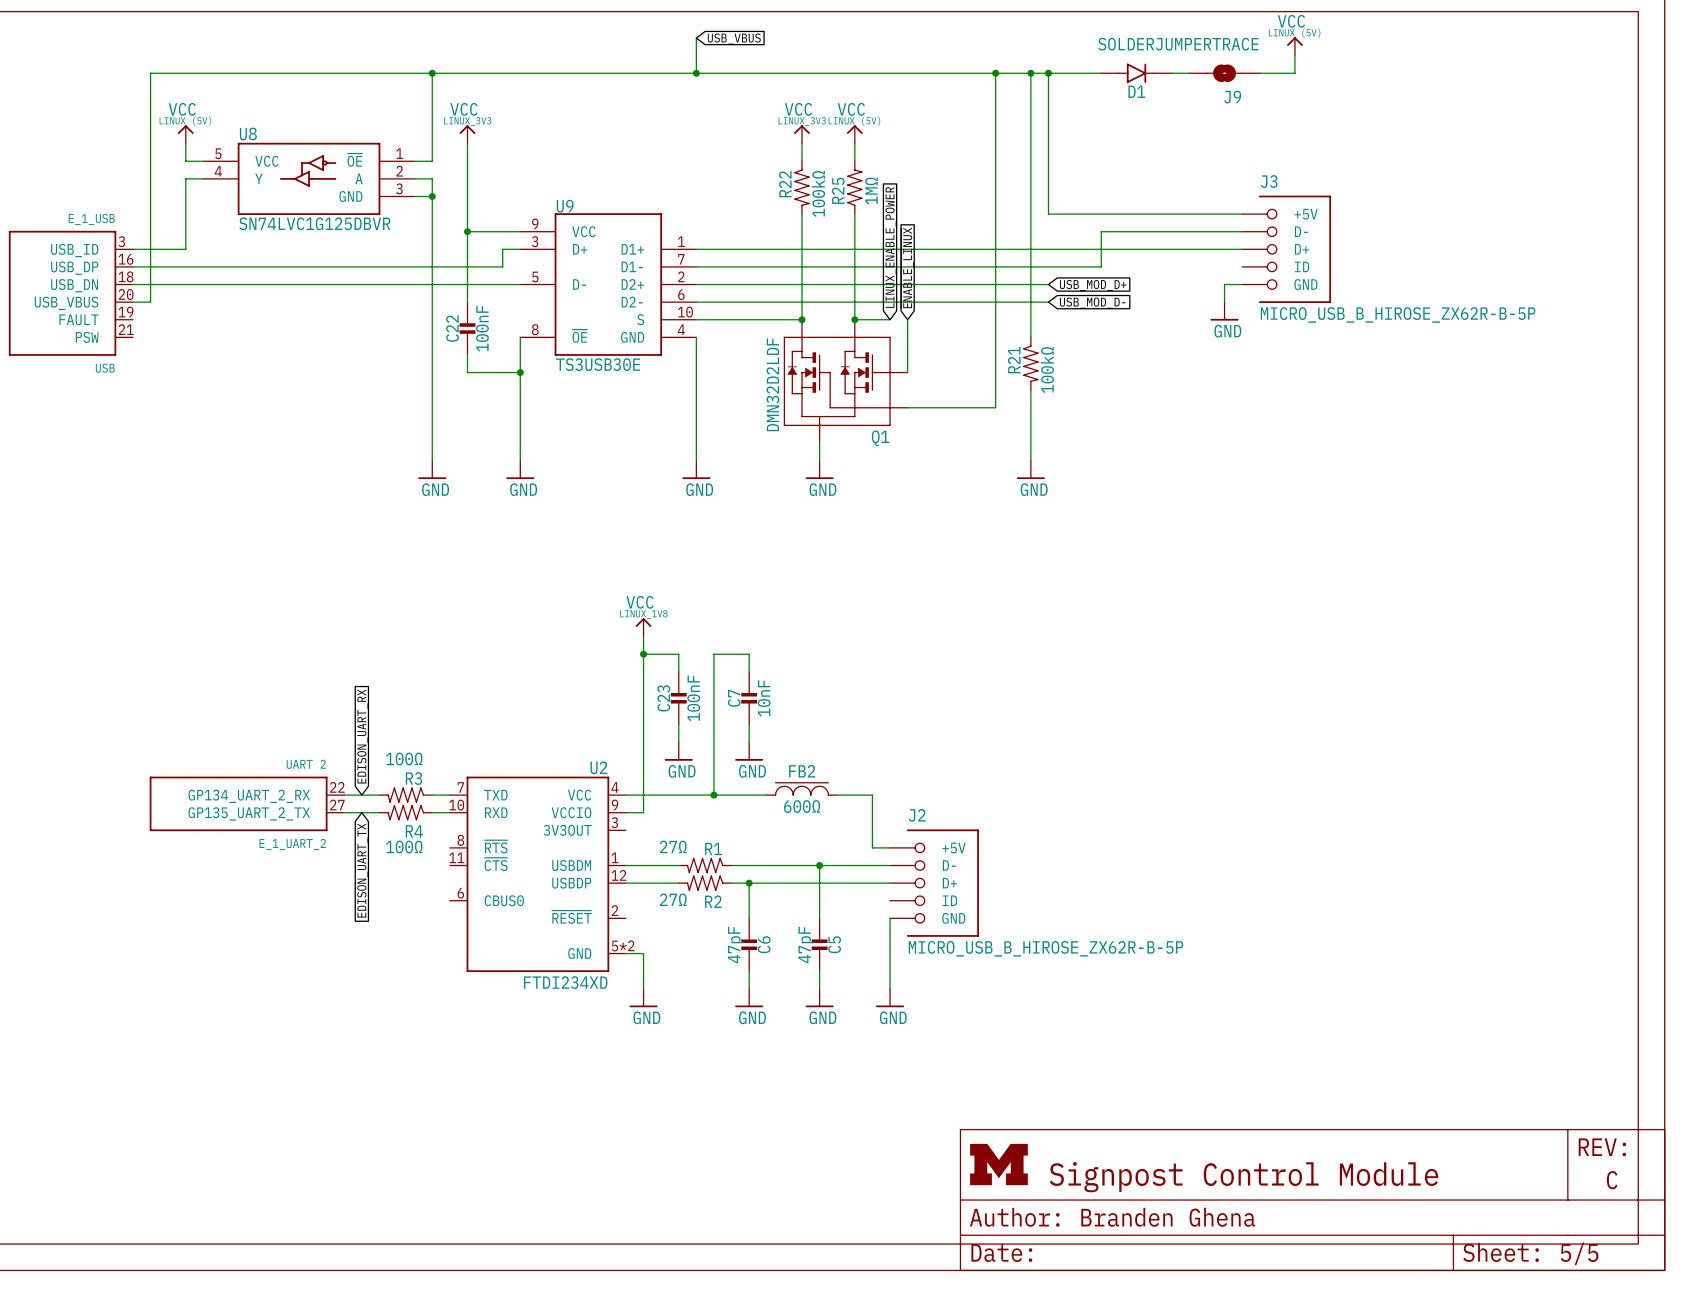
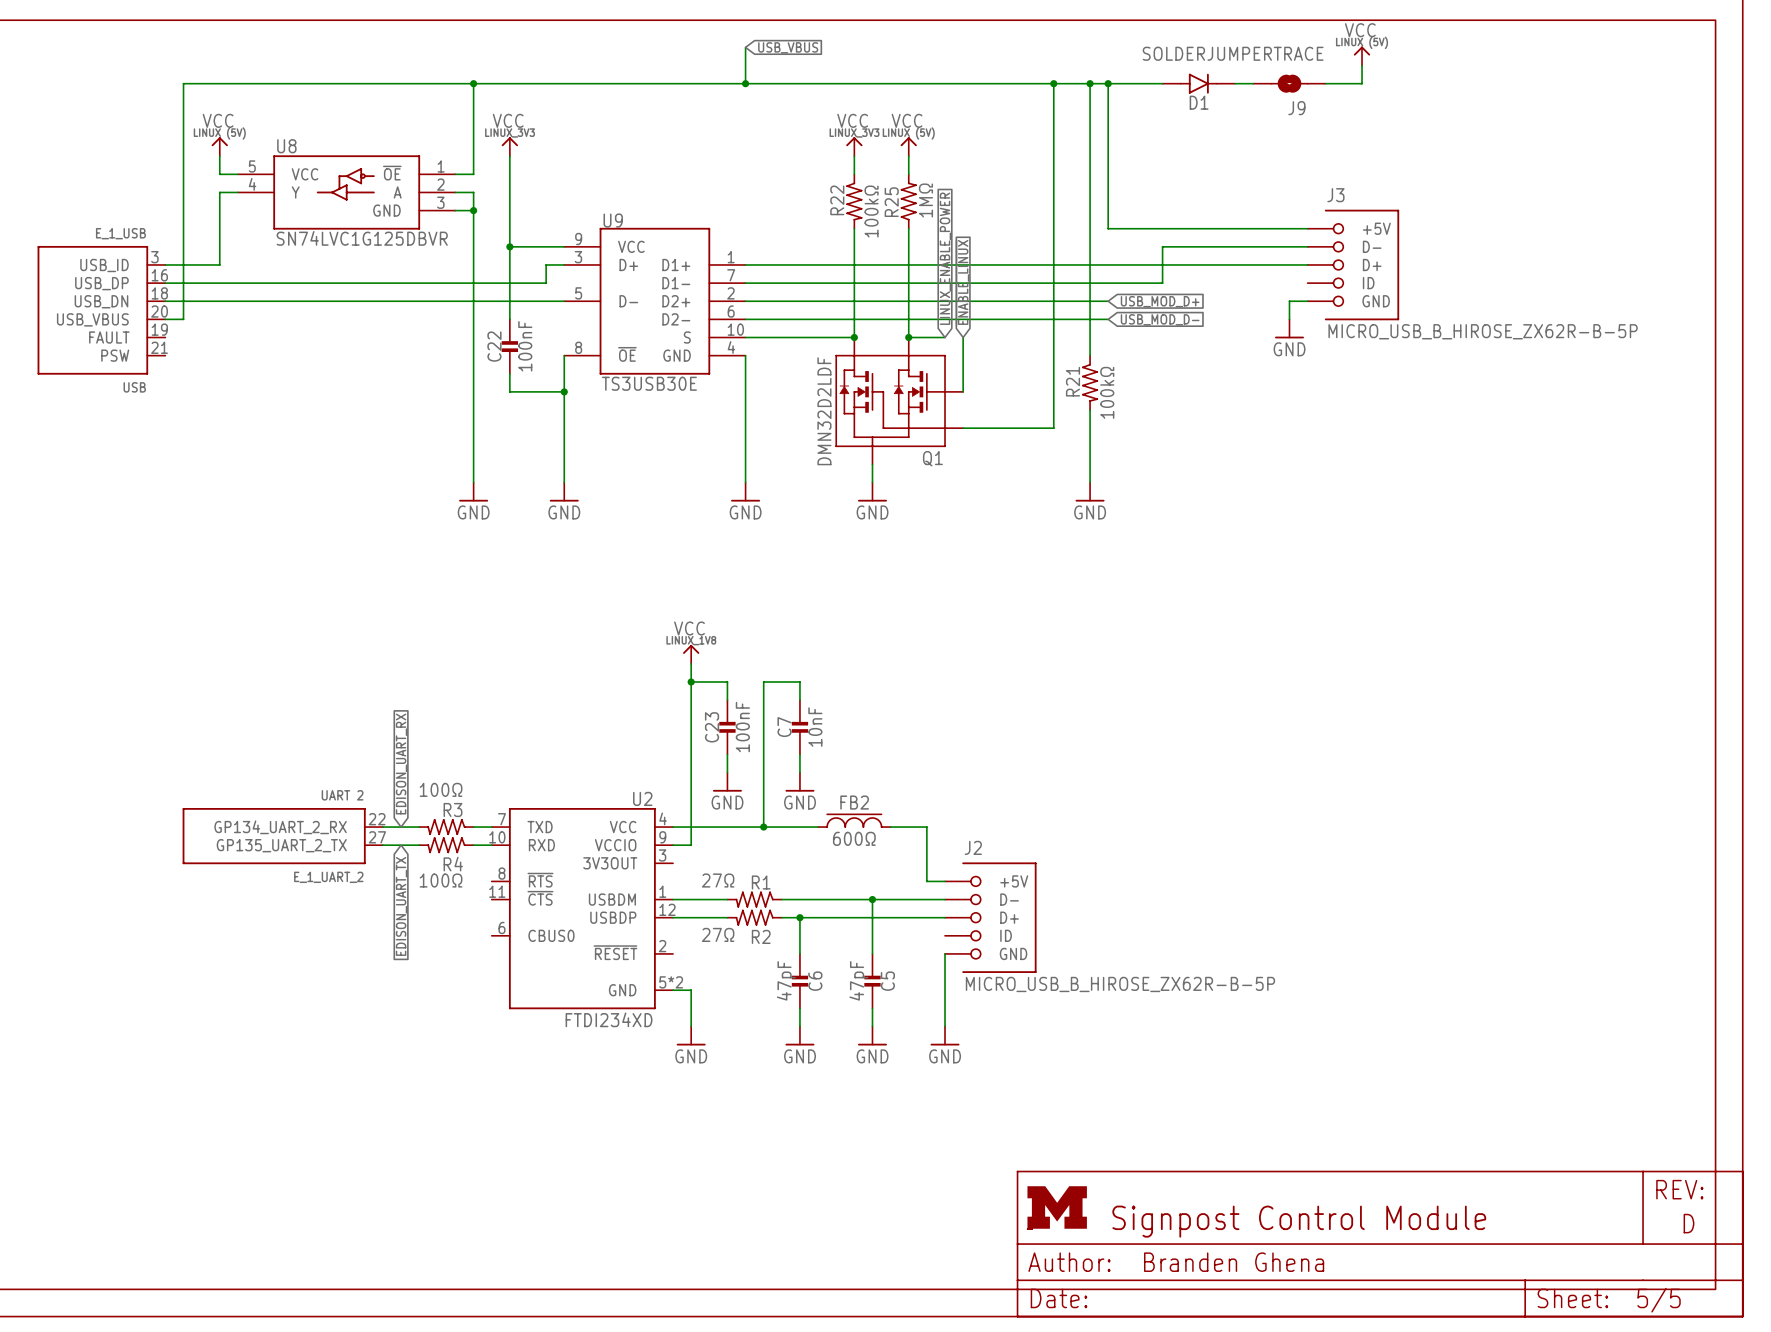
part text: C (1612, 1180) -> D (1688, 1223)

